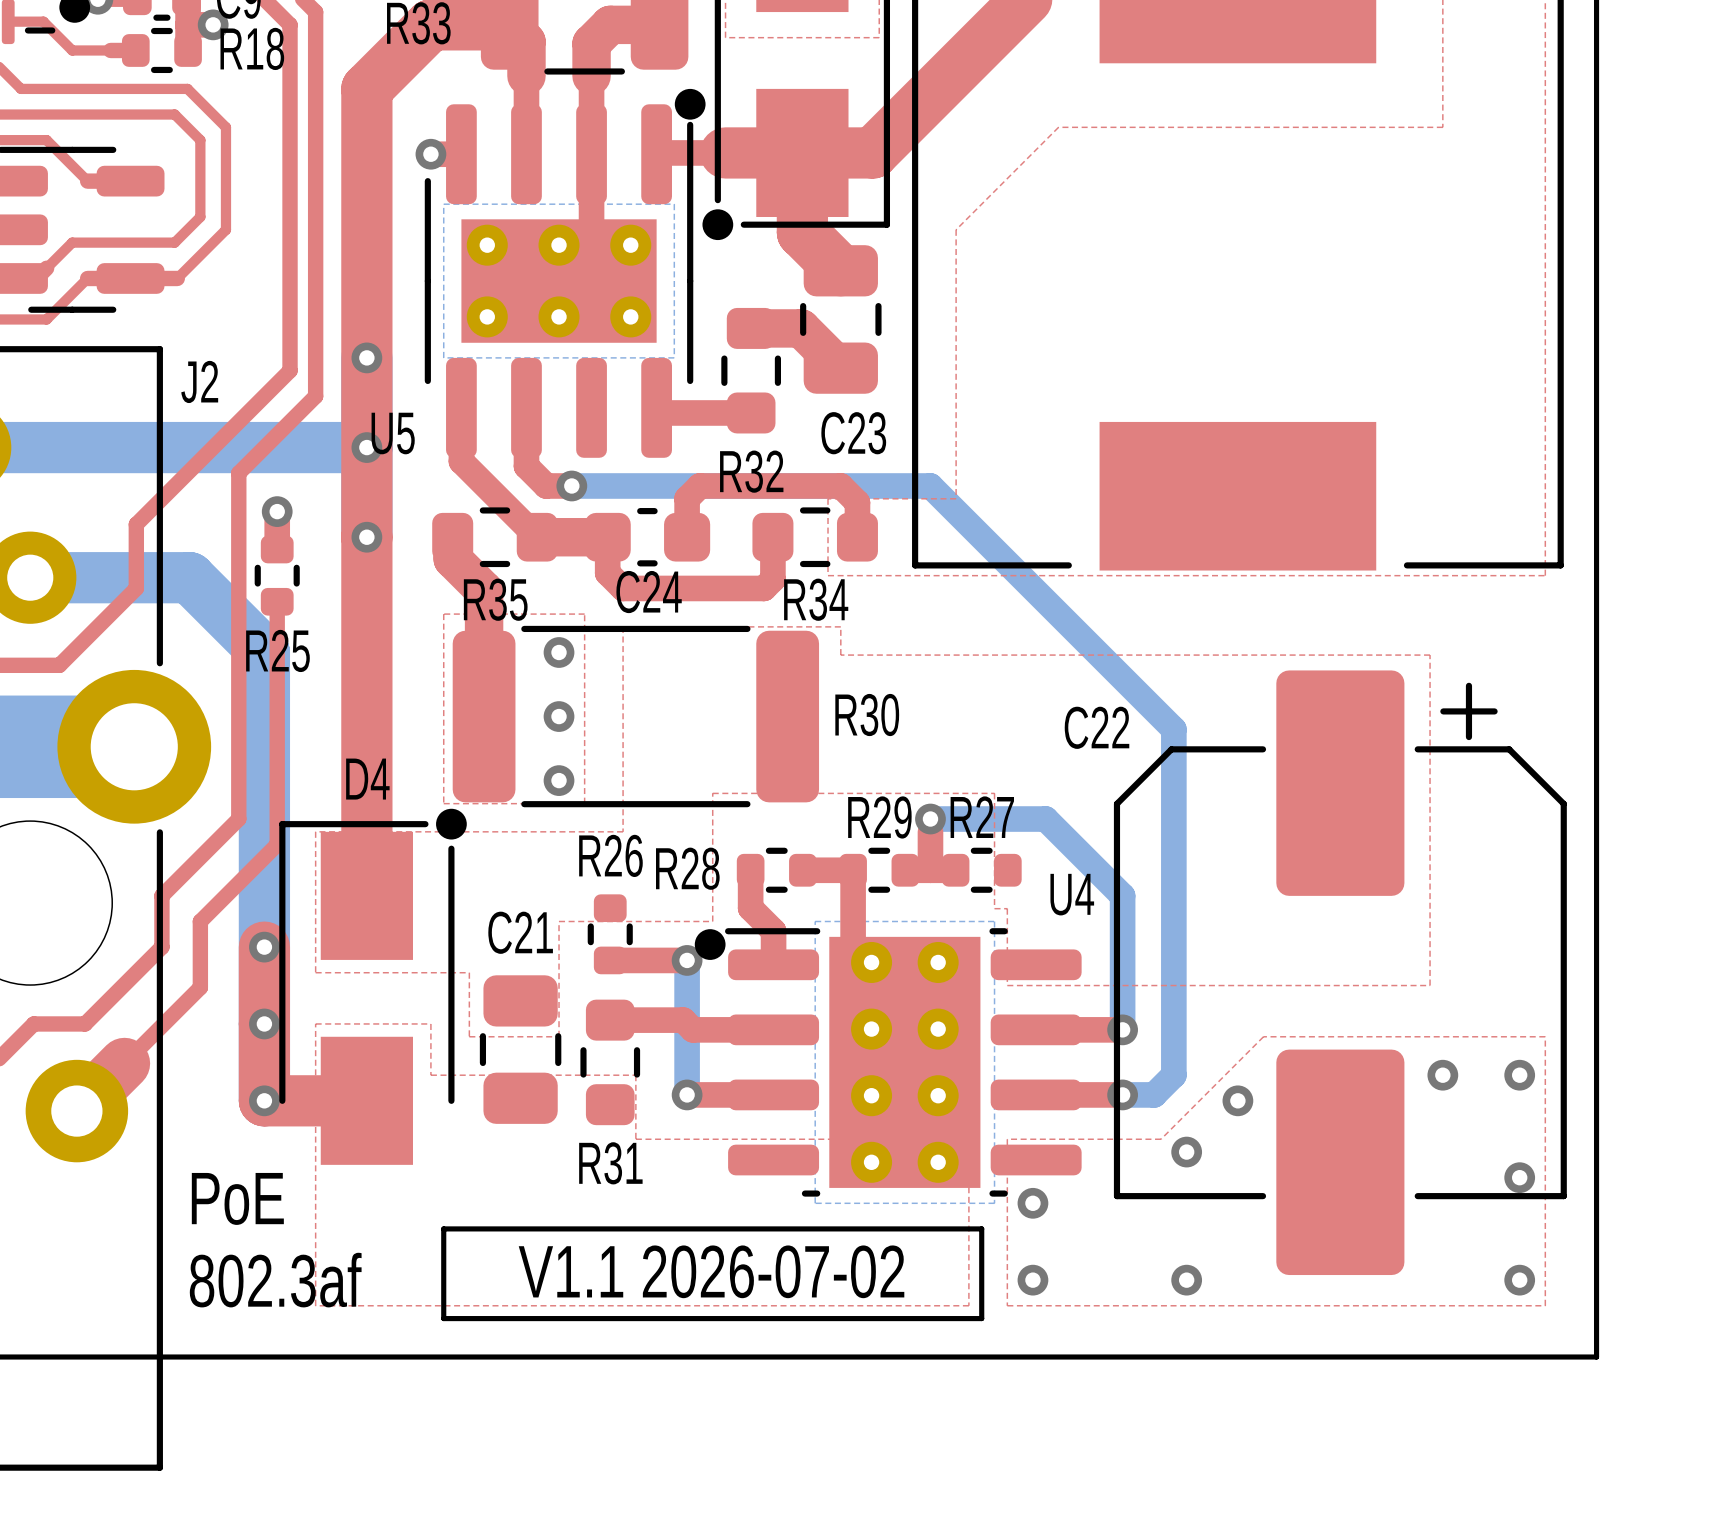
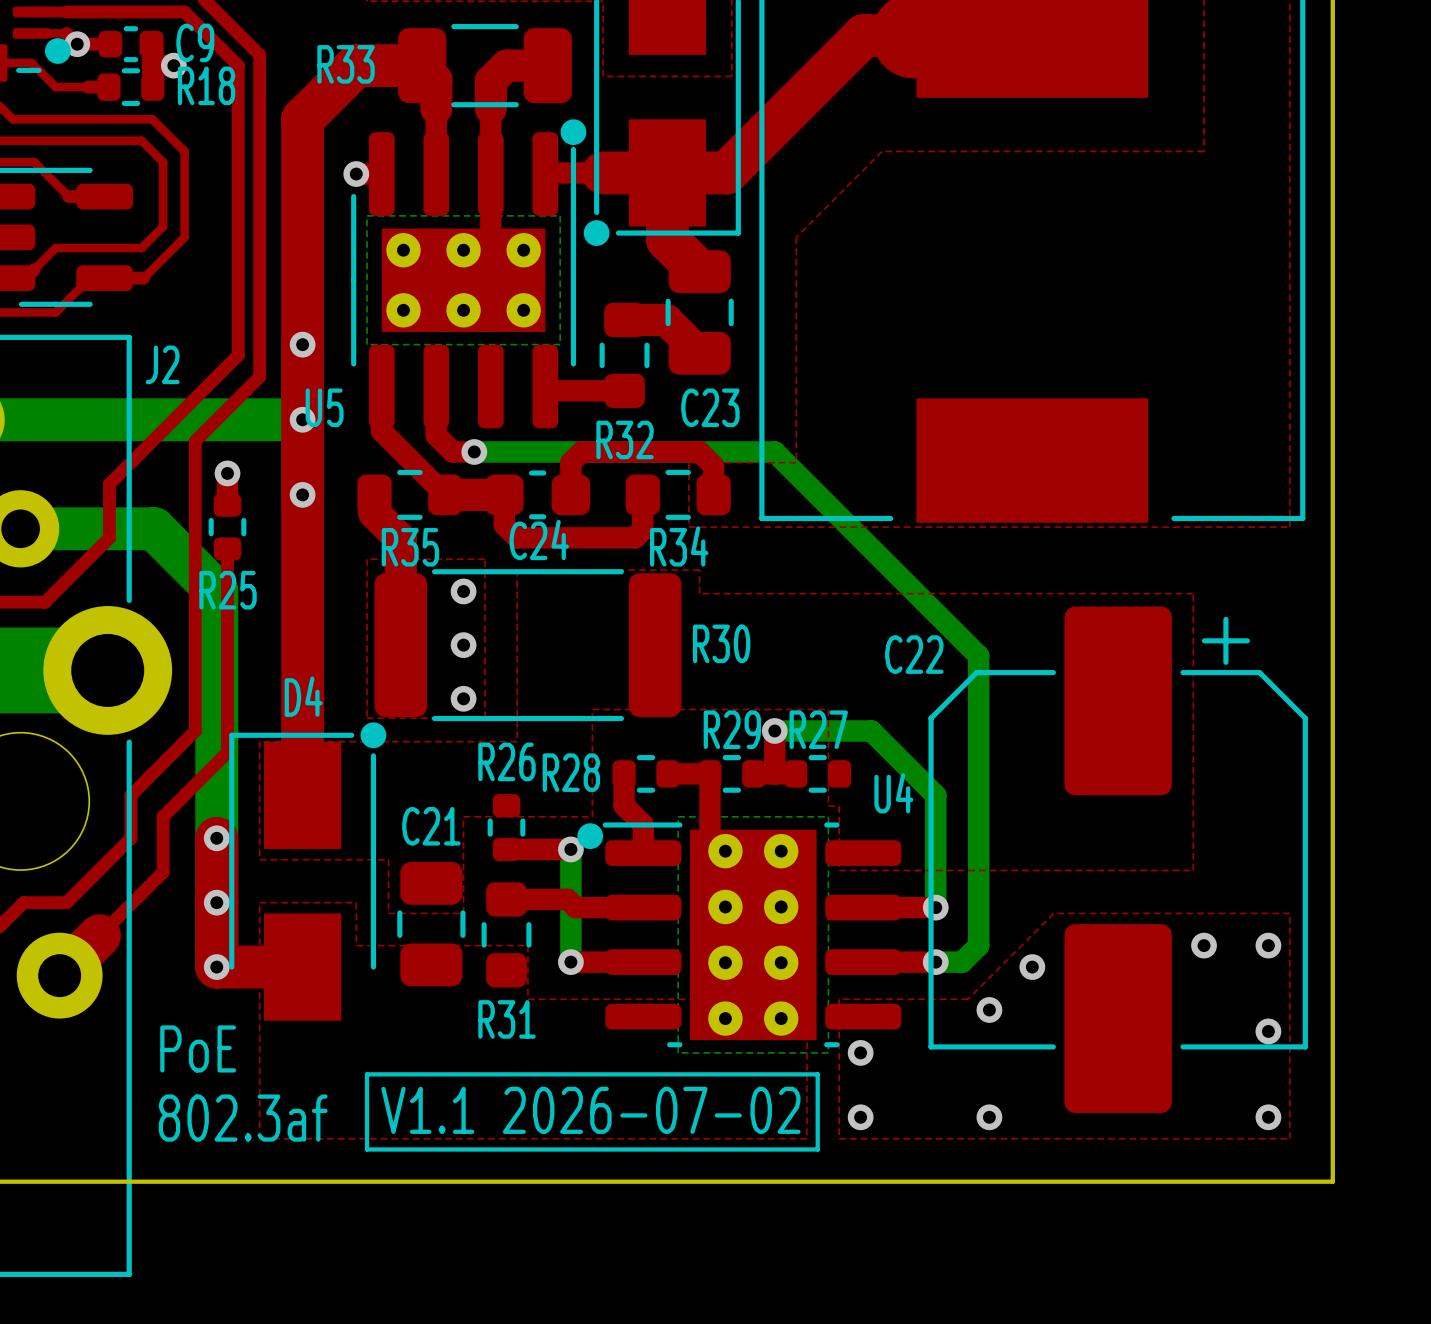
top track: (113, 278) (87, 278) (46, 319) -> (90, 278) (55, 312) (34, 312)

